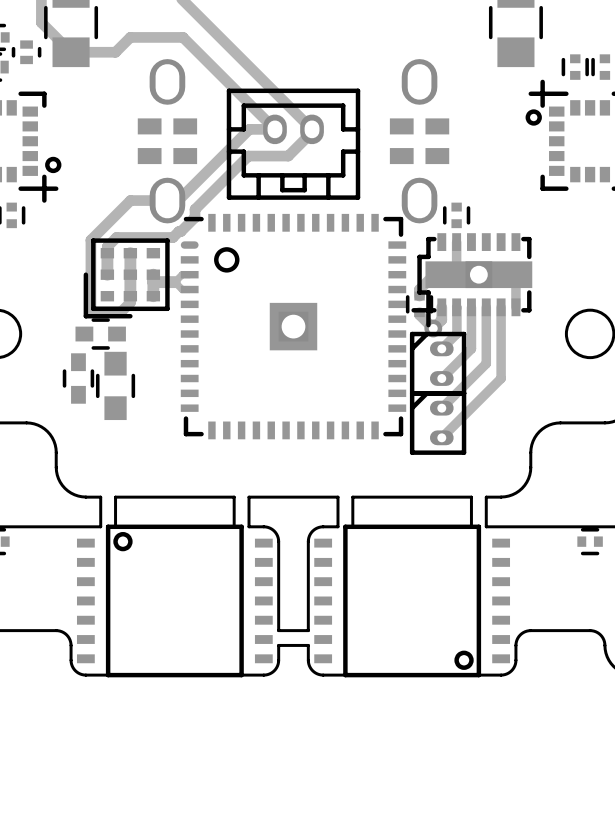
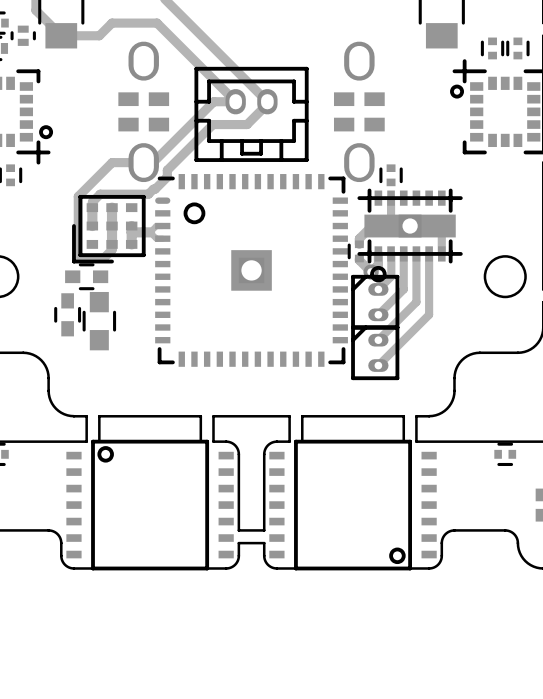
part footprint: [411, 233, 533, 328] -> [357, 188, 463, 283]

